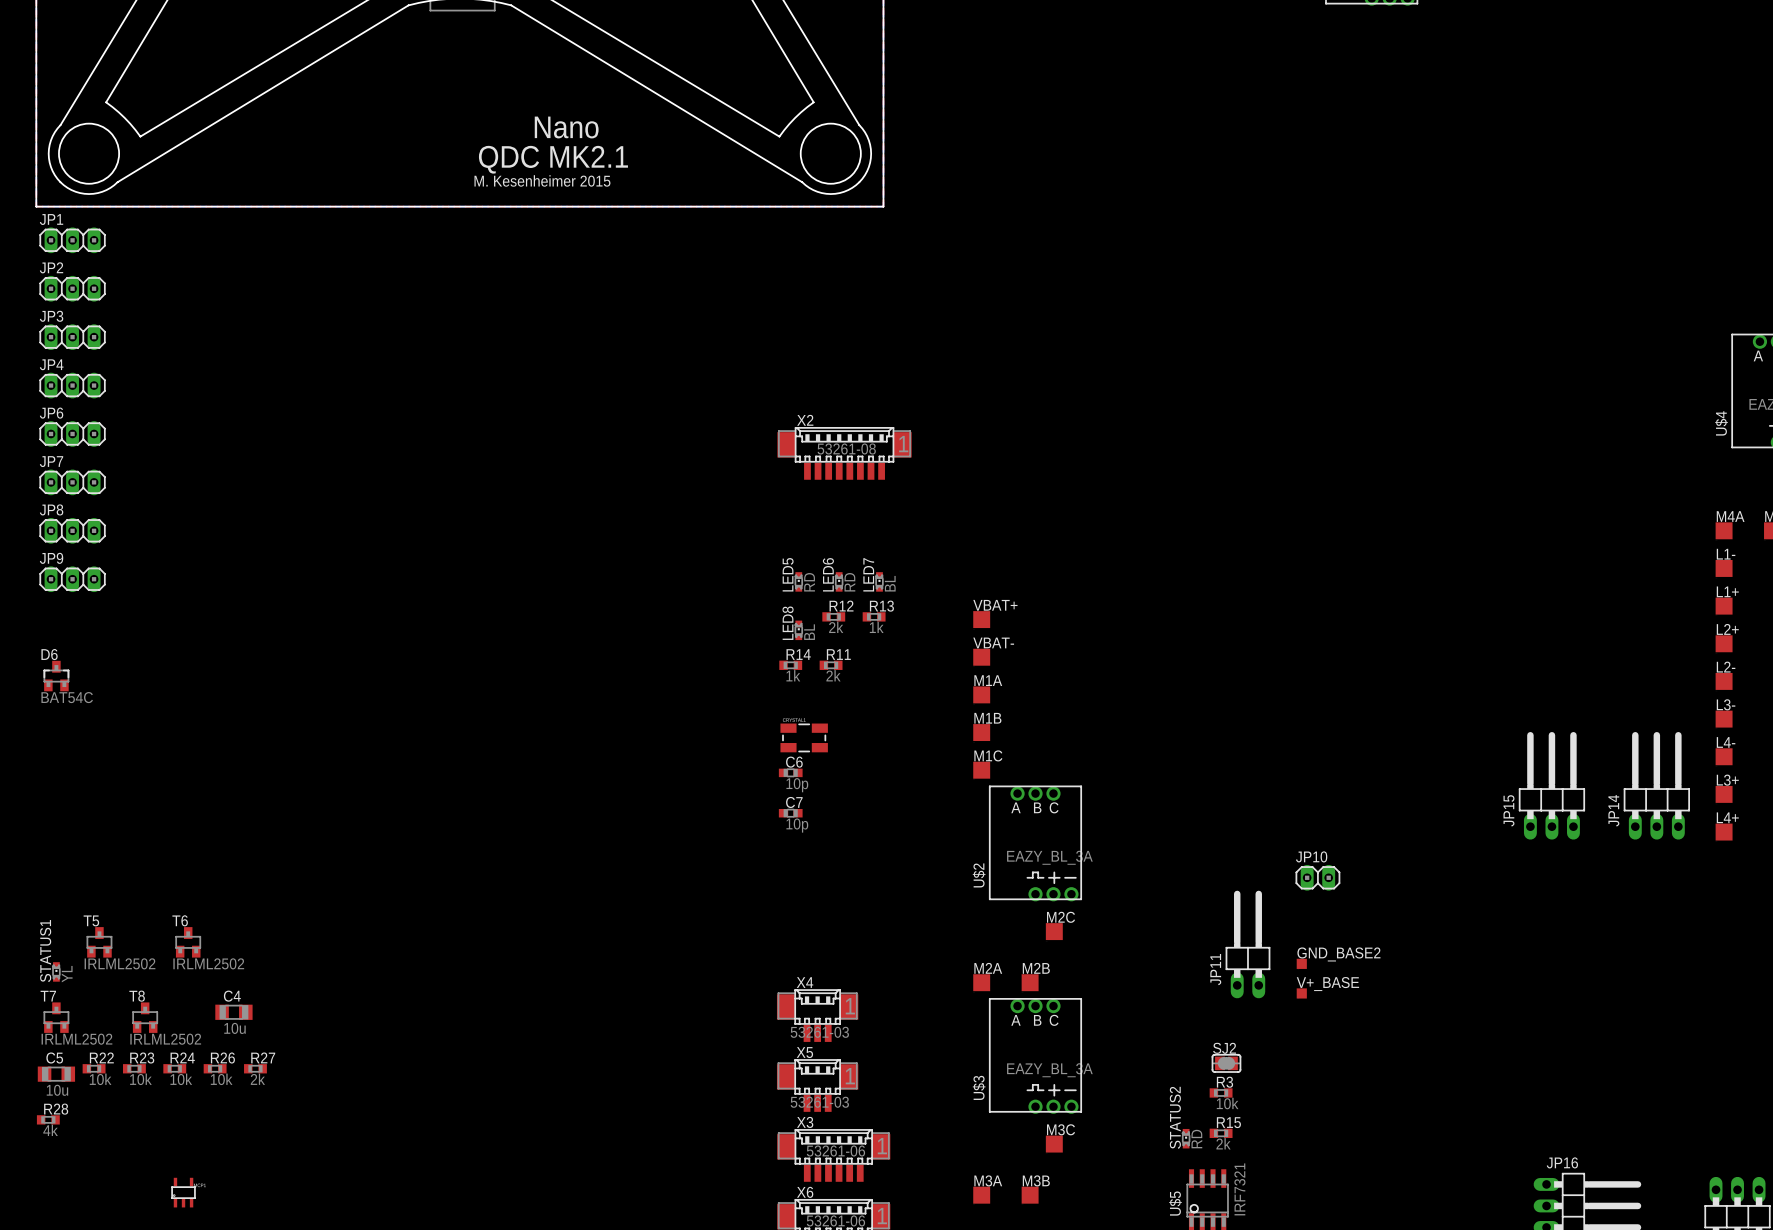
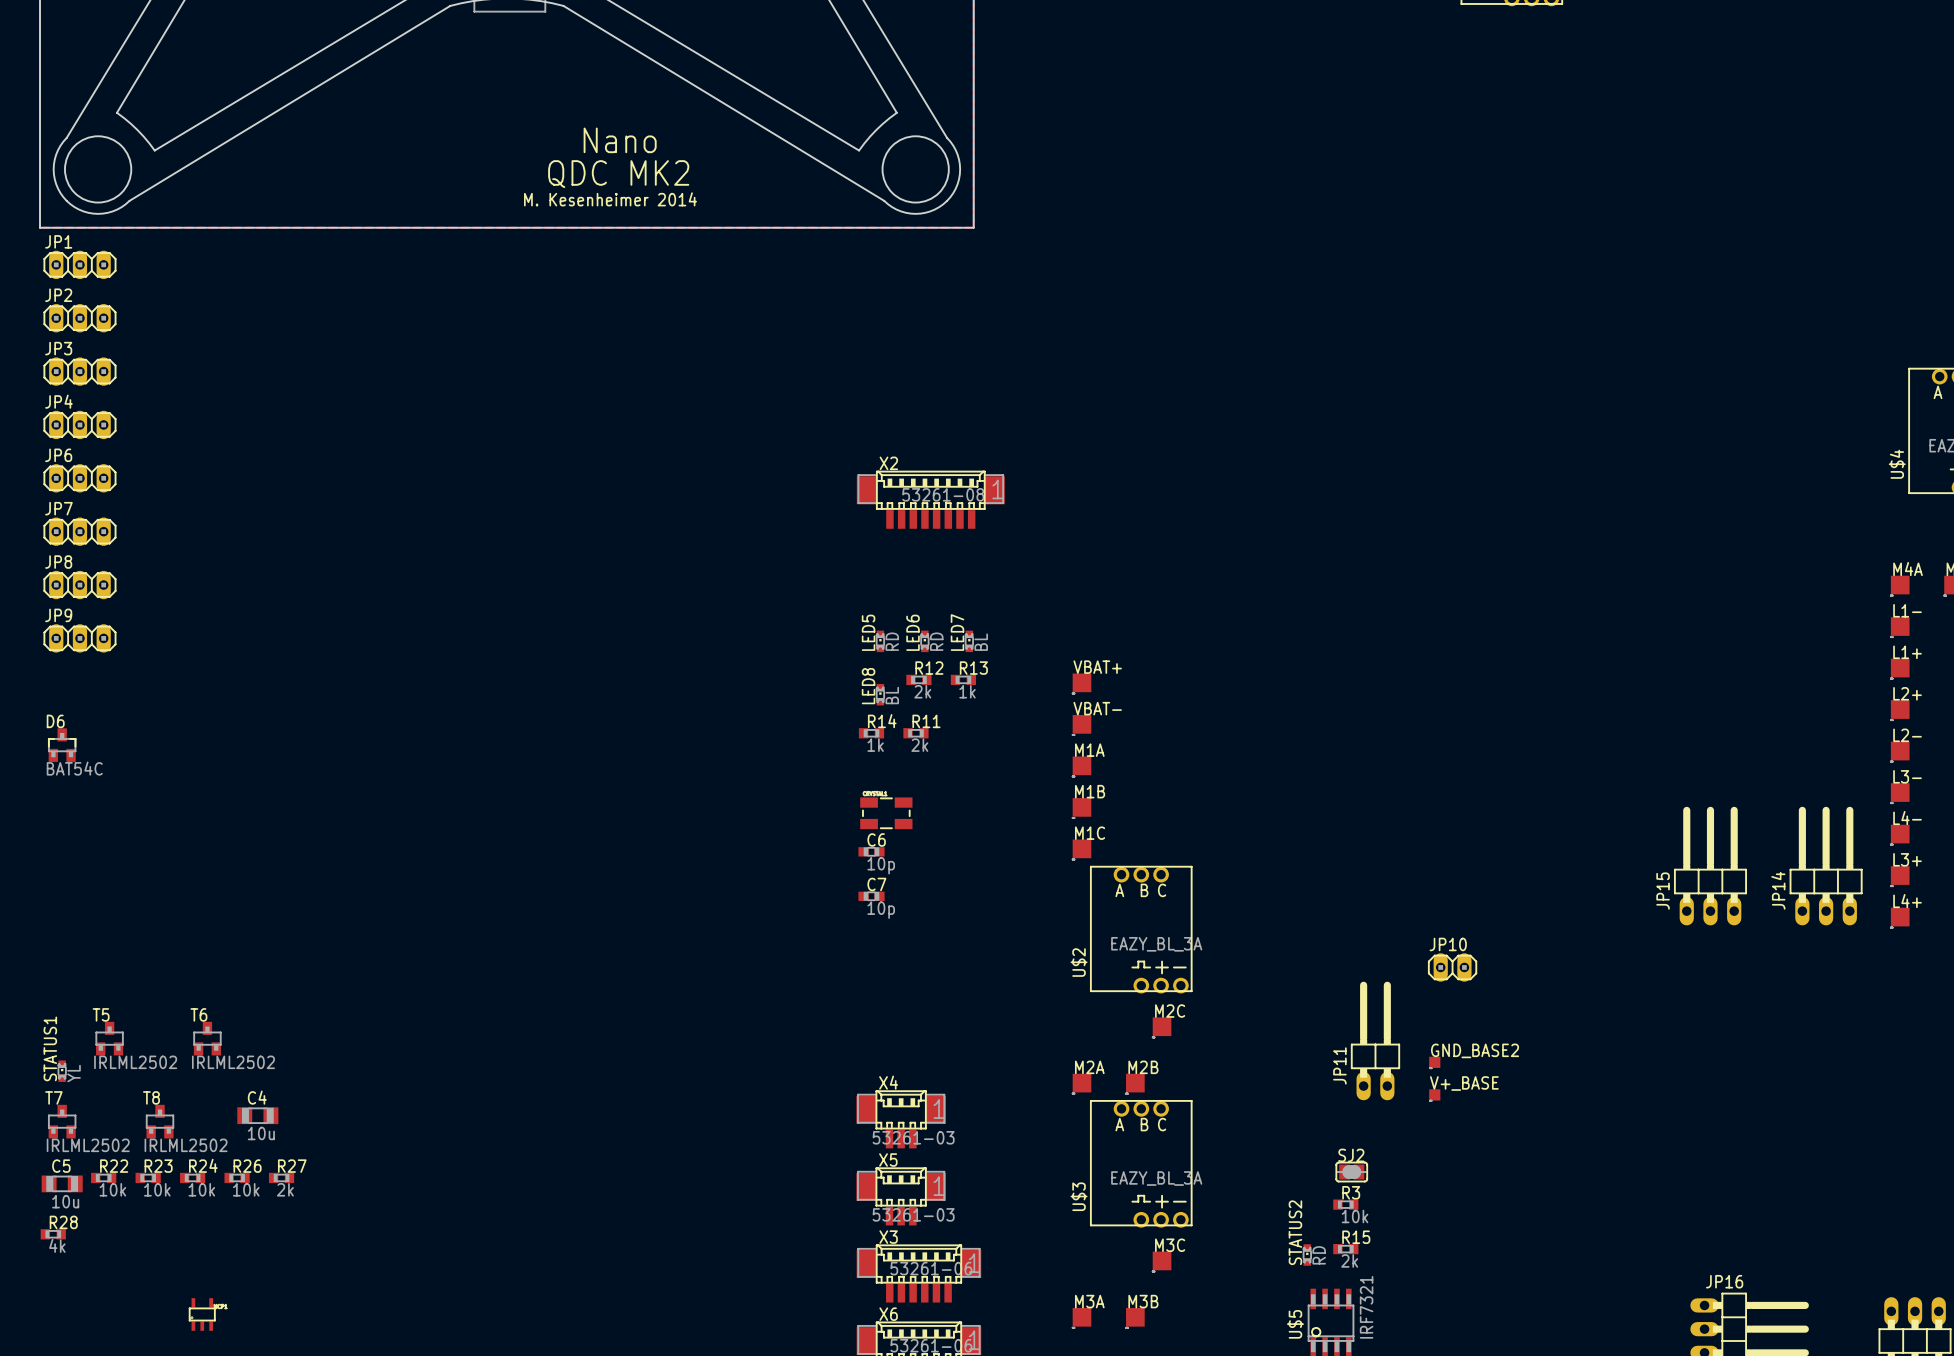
text: QDC MK2.1 (553, 159) -> QDC MK2 (618, 174)
text: M. Kesenheimer 2015 (542, 180) -> M. Kesenheimer 2014 (610, 199)

